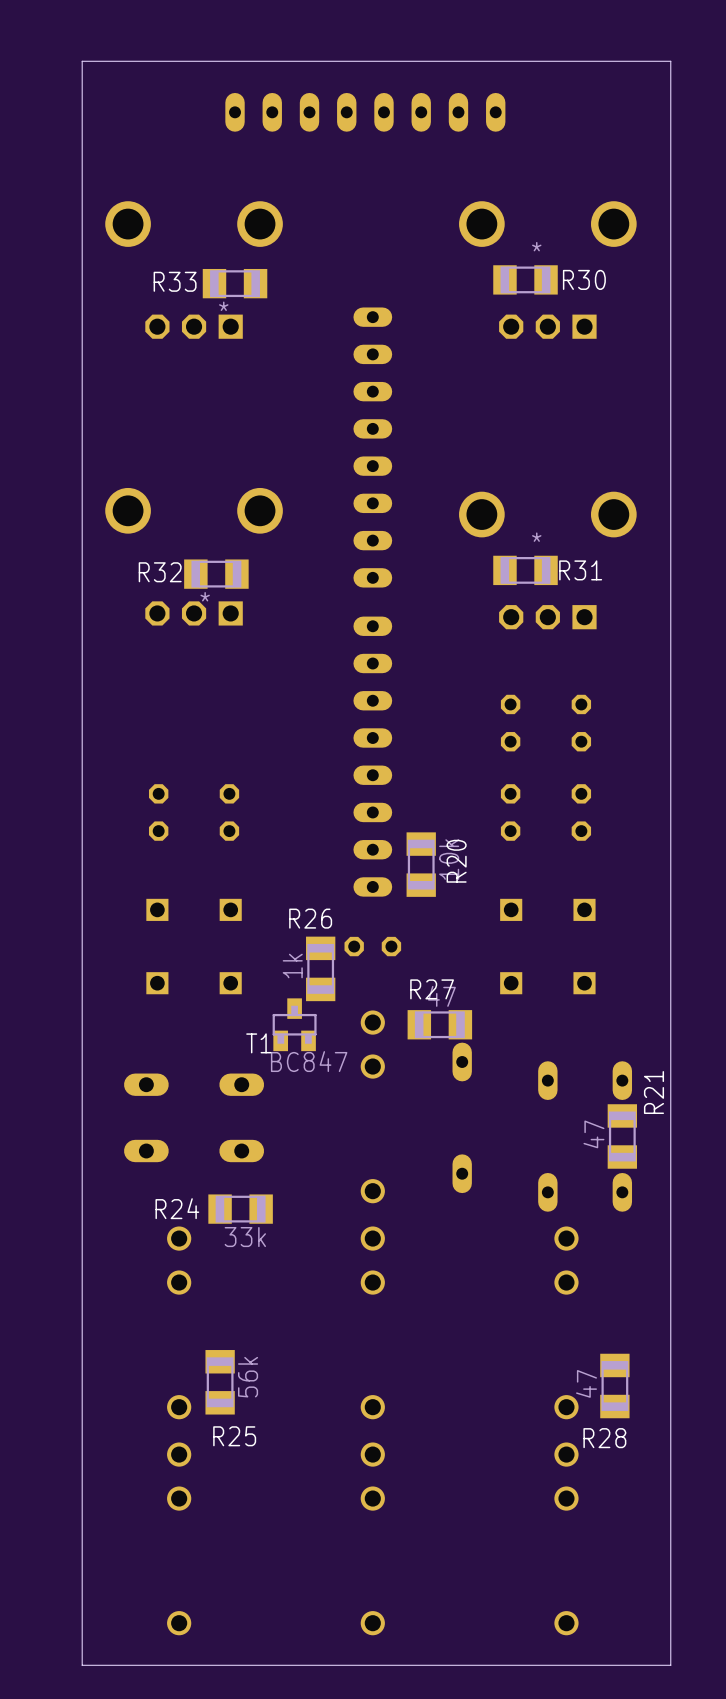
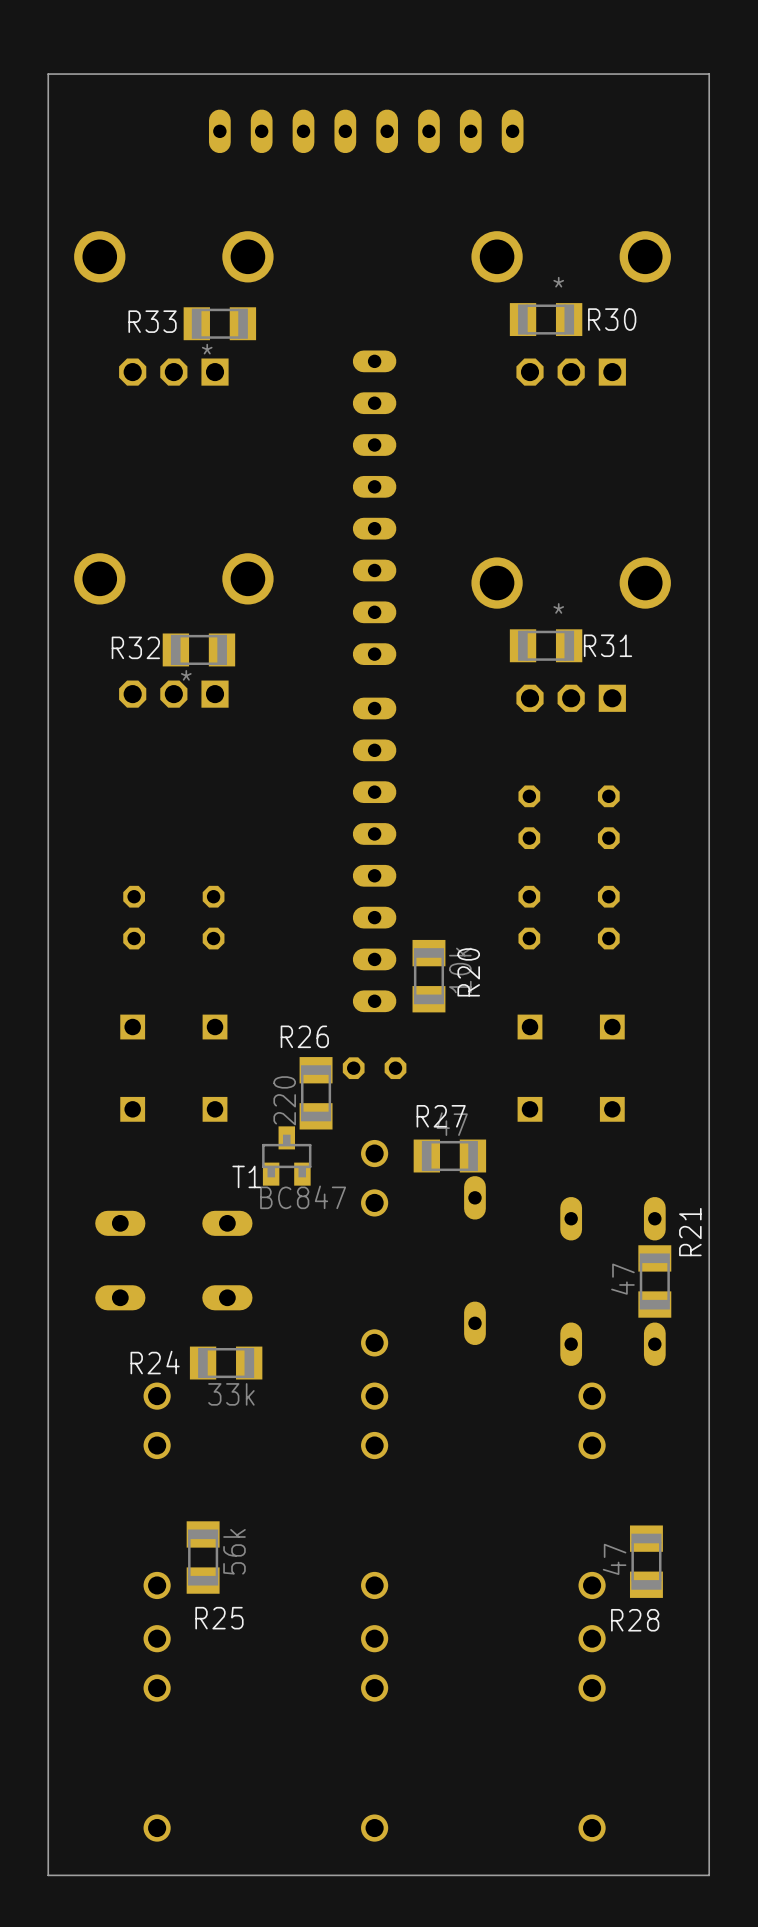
R26 value: 1k (292, 966) -> 220 (284, 1100)

